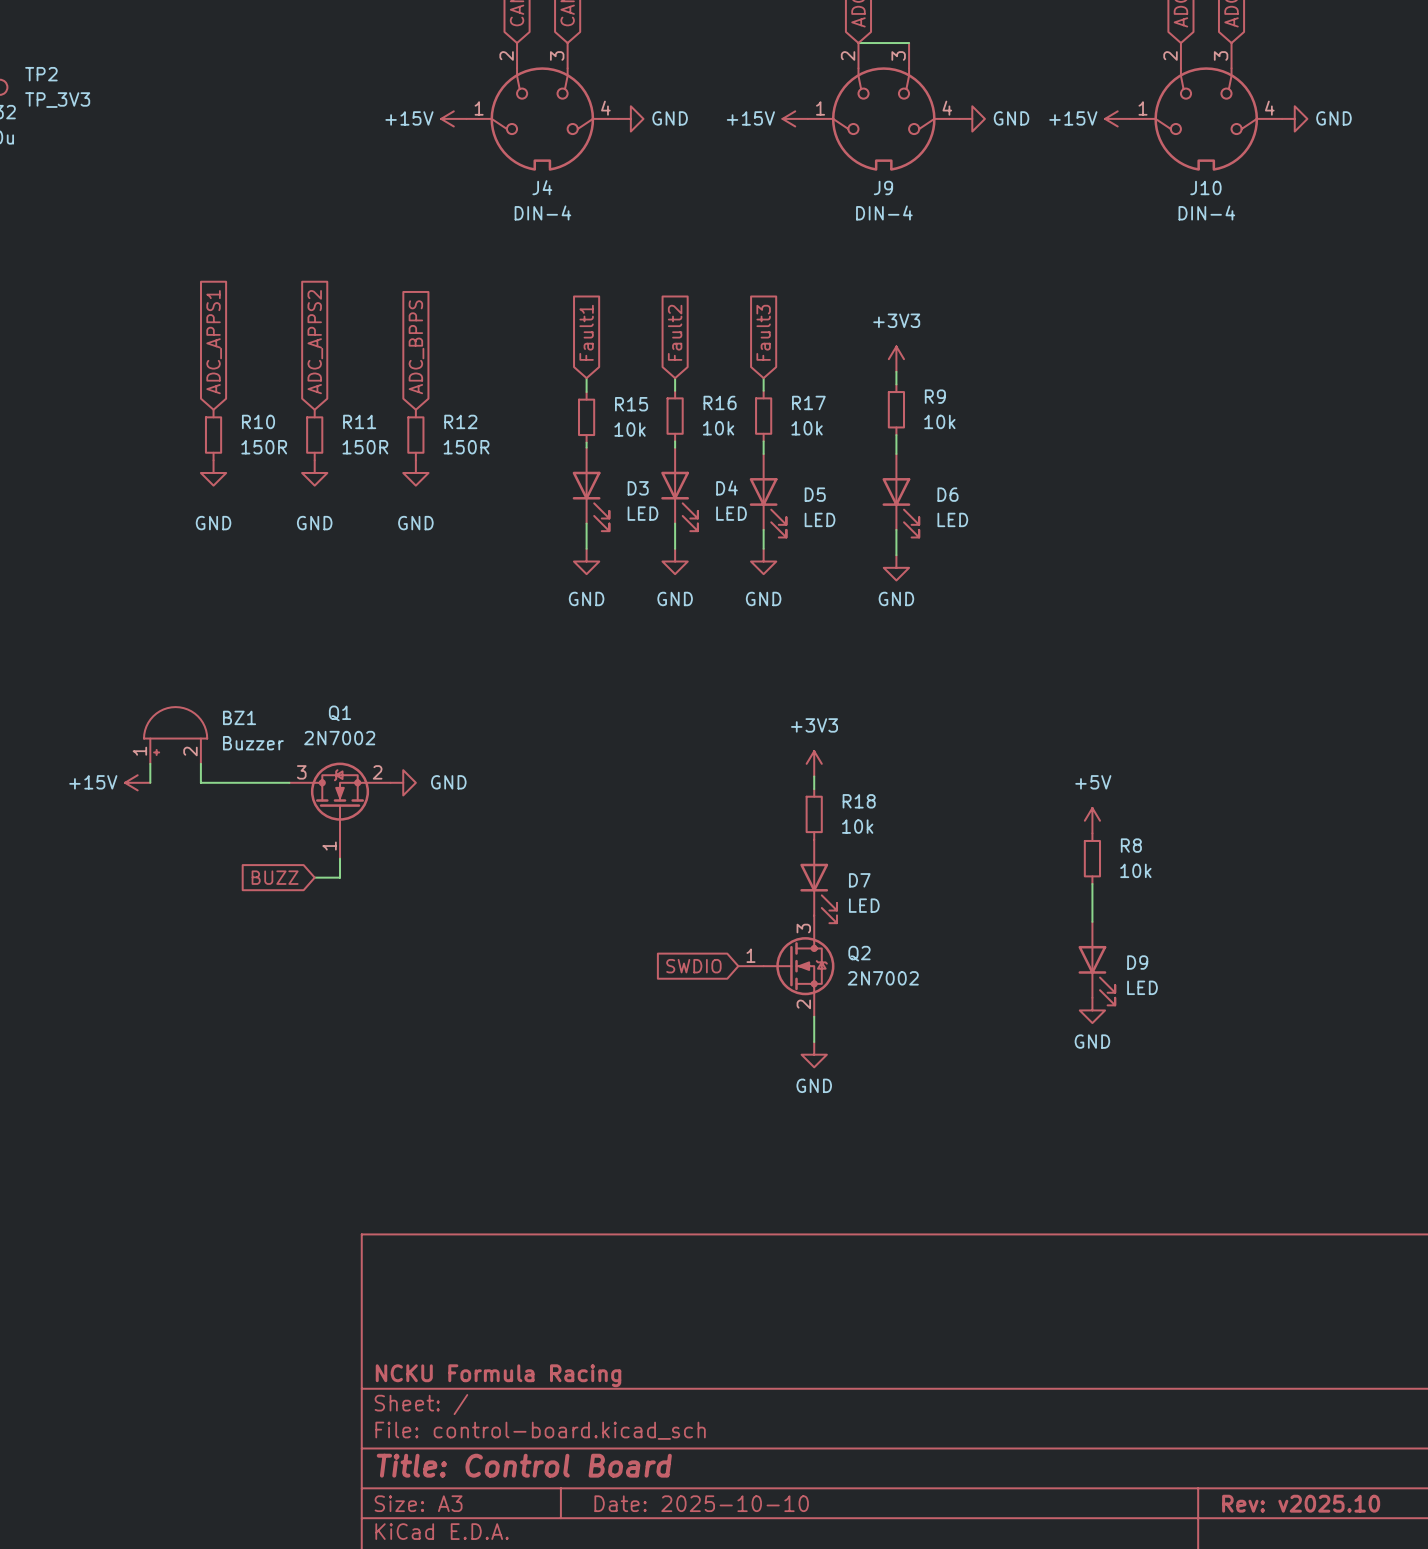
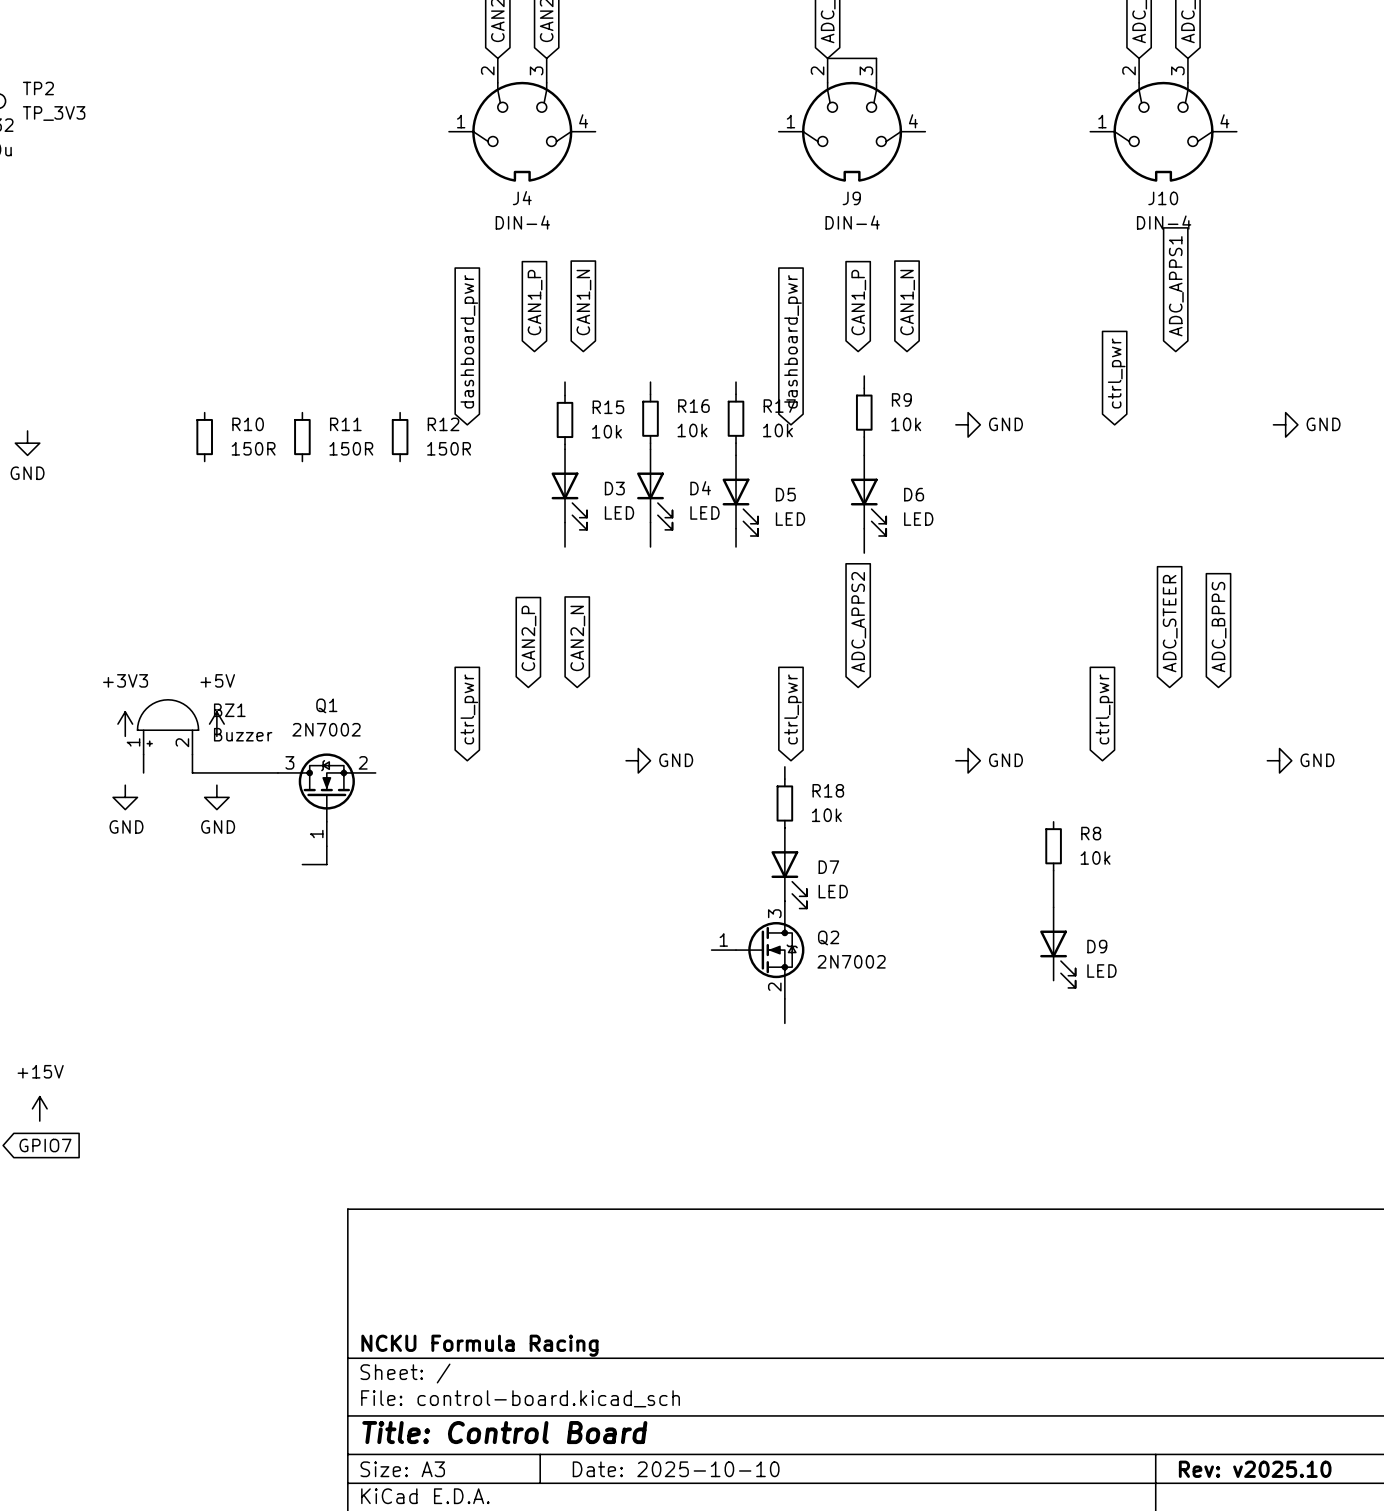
power symbol: +15V (453, 118) -> none
power symbol: GND (630, 118) -> none
power symbol: +15V (795, 118) -> none
power symbol: GND (972, 118) -> none
power symbol: +15V (1117, 118) -> none
power symbol: GND (1294, 118) -> none
global label: none -> ADC_APPS1 (1176, 286)
global label: none -> CAN1_P (535, 302)
global label: none -> CAN1_N (583, 302)
global label: none -> CAN1_P (858, 302)
global label: none -> CAN1_N (907, 302)
global label: Fault1 (586, 332) -> none
global label: Fault2 (675, 332) -> none
global label: Fault3 (763, 332) -> none
global label: none -> dashboard_pwr (469, 341)
global label: none -> dashboard_pwr (793, 341)
global label: ADC_APPS1 (214, 342) -> none
global label: ADC_APPS2 (315, 342) -> none
global label: ADC_BPPS (416, 347) -> none
power symbol: +3V3 (896, 359) -> none
global label: none -> ctrl_pwr (1116, 373)
power symbol: none -> GND (968, 424)
power symbol: none -> GND (1285, 424)
power symbol: none -> GND (27, 443)
power symbol: GND (213, 472) -> none
power symbol: GND (314, 472) -> none
power symbol: GND (415, 472) -> none
power symbol: GND (586, 561) -> none
power symbol: GND (675, 561) -> none
power symbol: GND (763, 561) -> none
power symbol: GND (896, 567) -> none
global label: none -> ADC_APPS2 (858, 622)
global label: none -> ADC_STEER (1170, 623)
global label: none -> ADC_BPPS (1219, 627)
global label: none -> CAN2_P (528, 638)
global label: none -> CAN2_N (577, 638)
global label: none -> ctrl_pwr (469, 709)
global label: none -> ctrl_pwr (793, 709)
global label: none -> ctrl_pwr (1104, 709)
power symbol: none -> +3V3 (125, 724)
power symbol: none -> +5V (216, 724)
power symbol: +3V3 (814, 763) -> none
power symbol: none -> GND (638, 760)
power symbol: none -> GND (968, 760)
power symbol: none -> GND (1279, 760)
power symbol: +15V (137, 782) -> none
power symbol: GND (403, 782) -> none
power symbol: none -> GND (125, 797)
power symbol: none -> GND (216, 797)
power symbol: +5V (1092, 820) -> none
global label: BUZZ (275, 877) -> none
global label: SWDIO (693, 966) -> none
power symbol: GND (1092, 1010) -> none
power symbol: GND (814, 1054) -> none
power symbol: none -> +15V (39, 1108)
global label: none -> GPIO7 (45, 1145)

